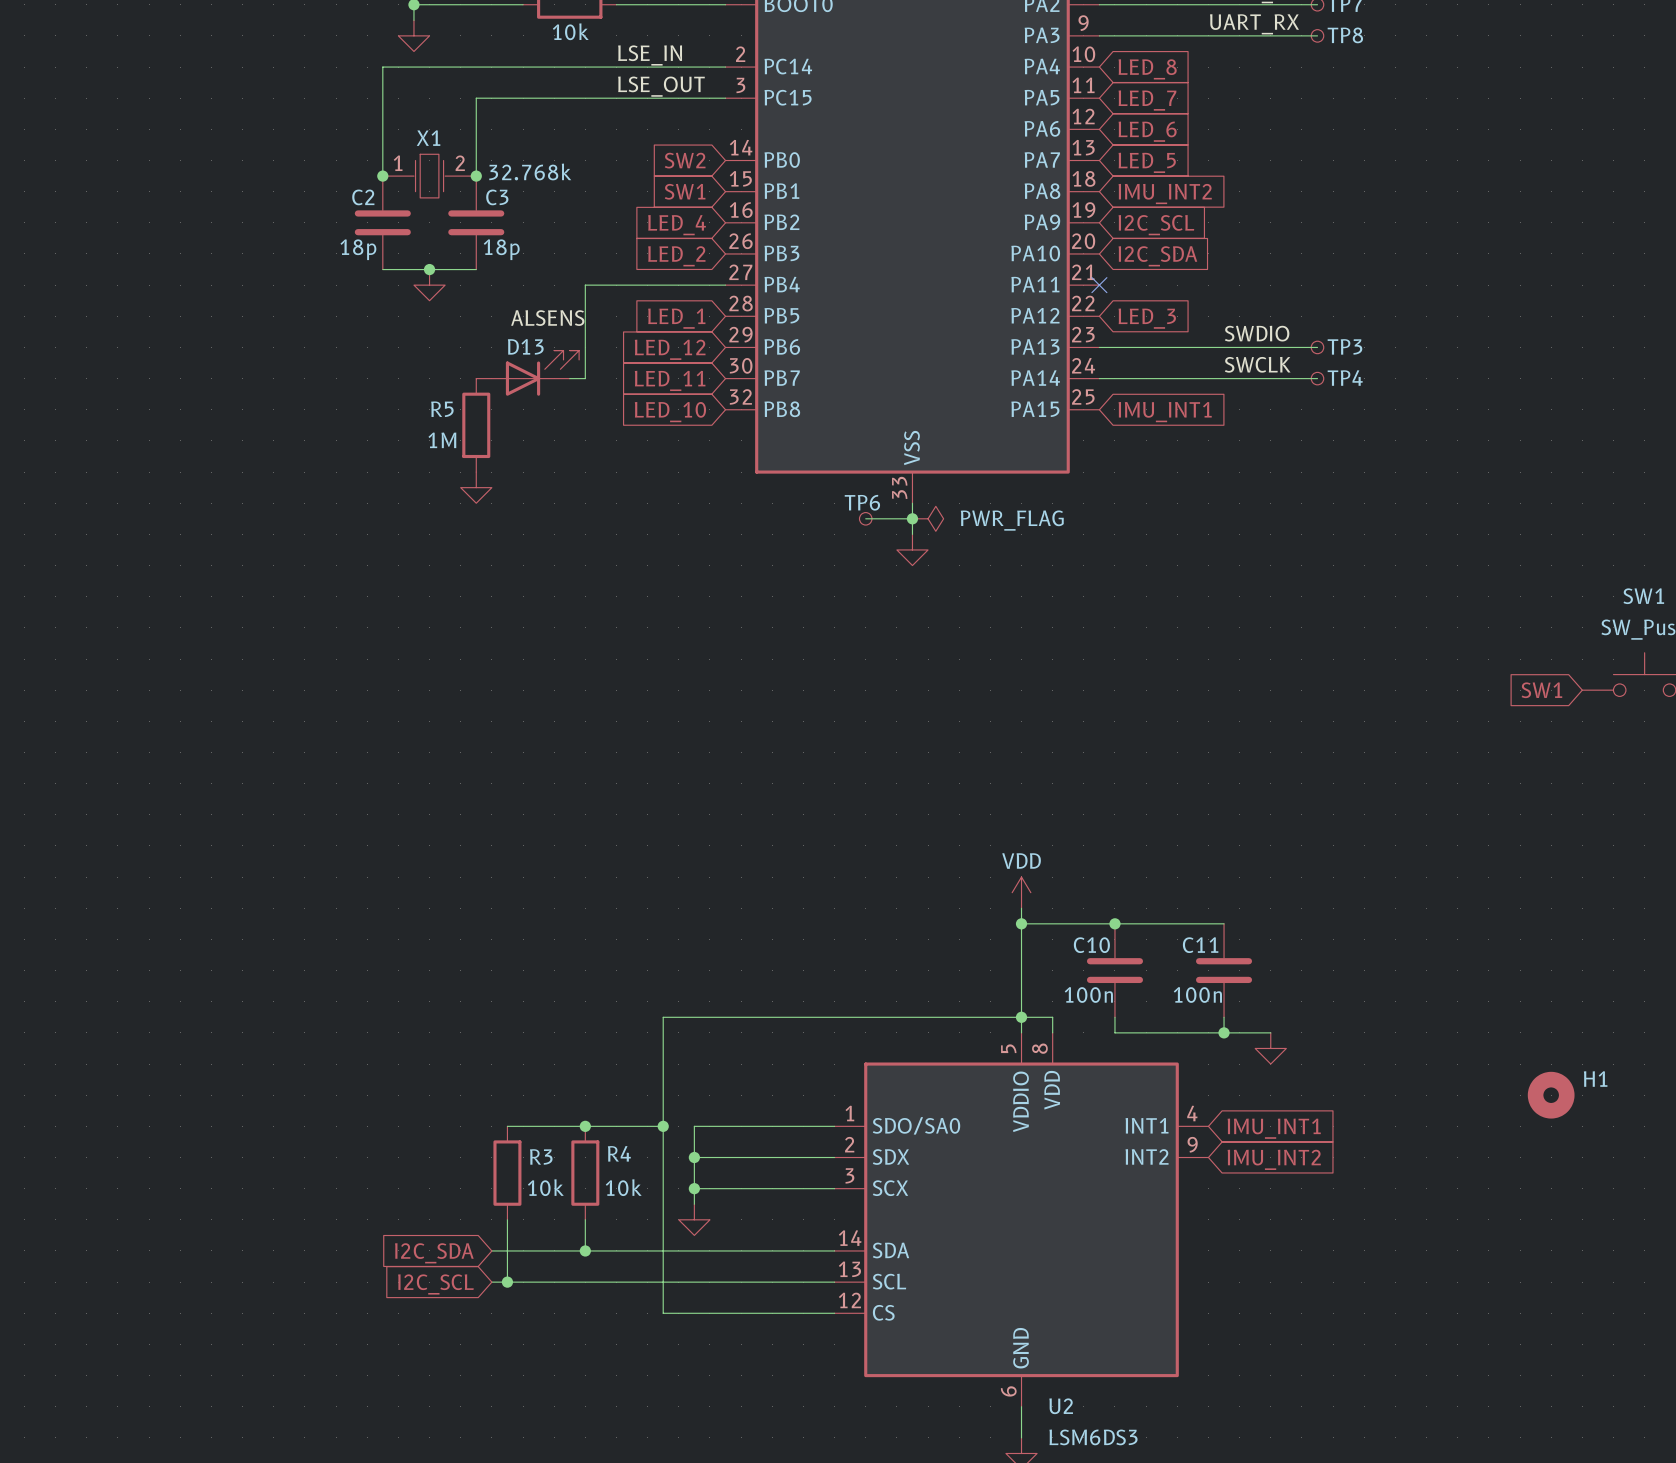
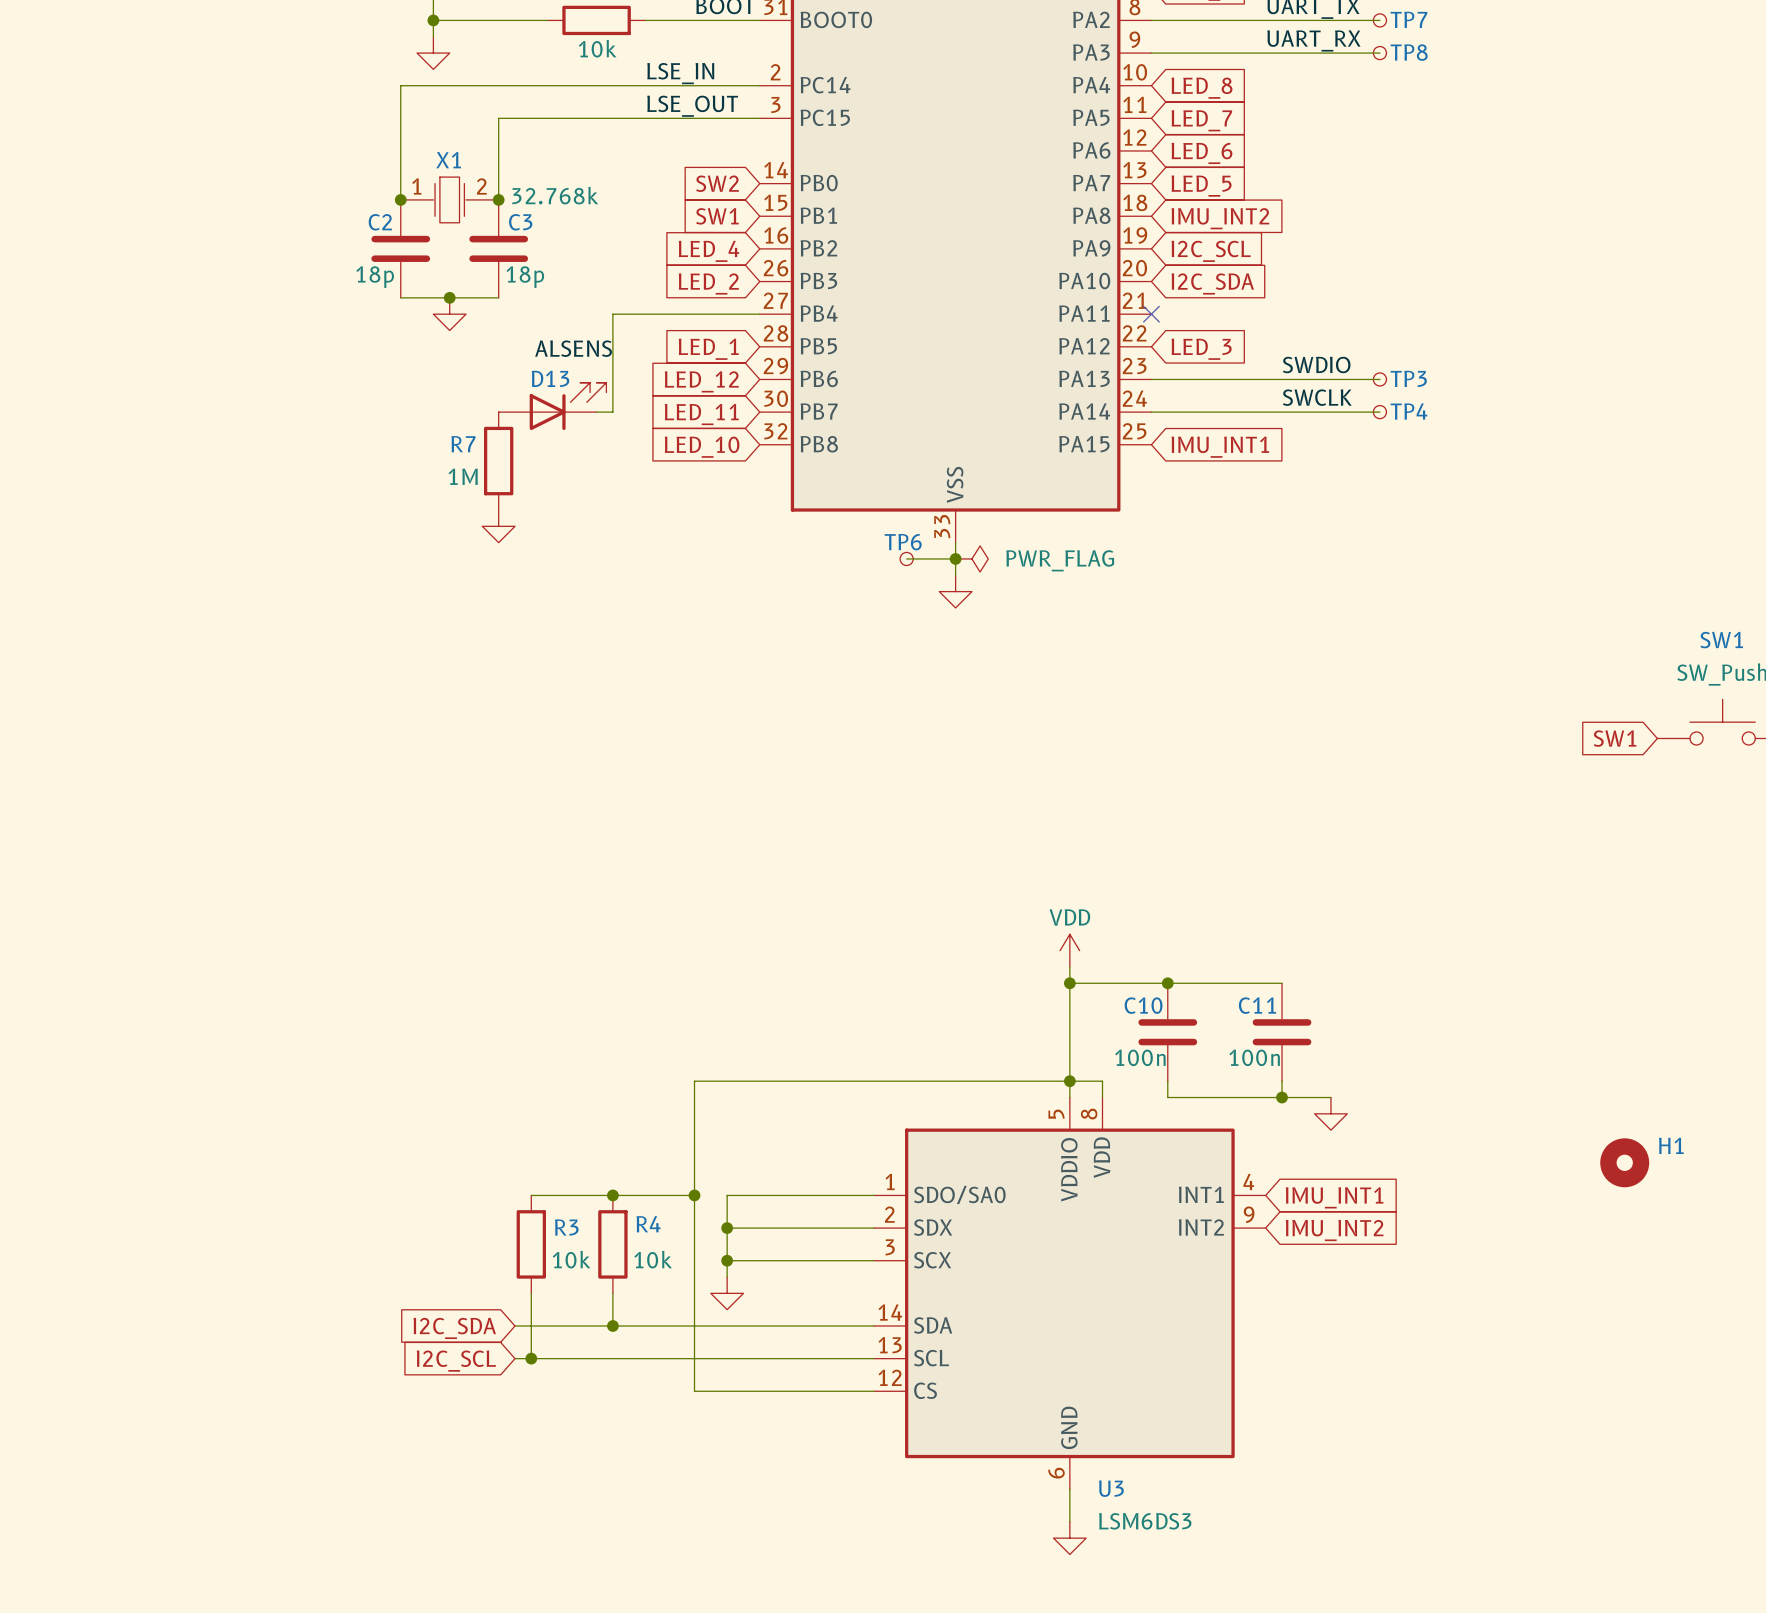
R5 name: R5 (442, 409) -> R7 (463, 444)
U2 name: U2 (1061, 1406) -> U3 (1111, 1488)

